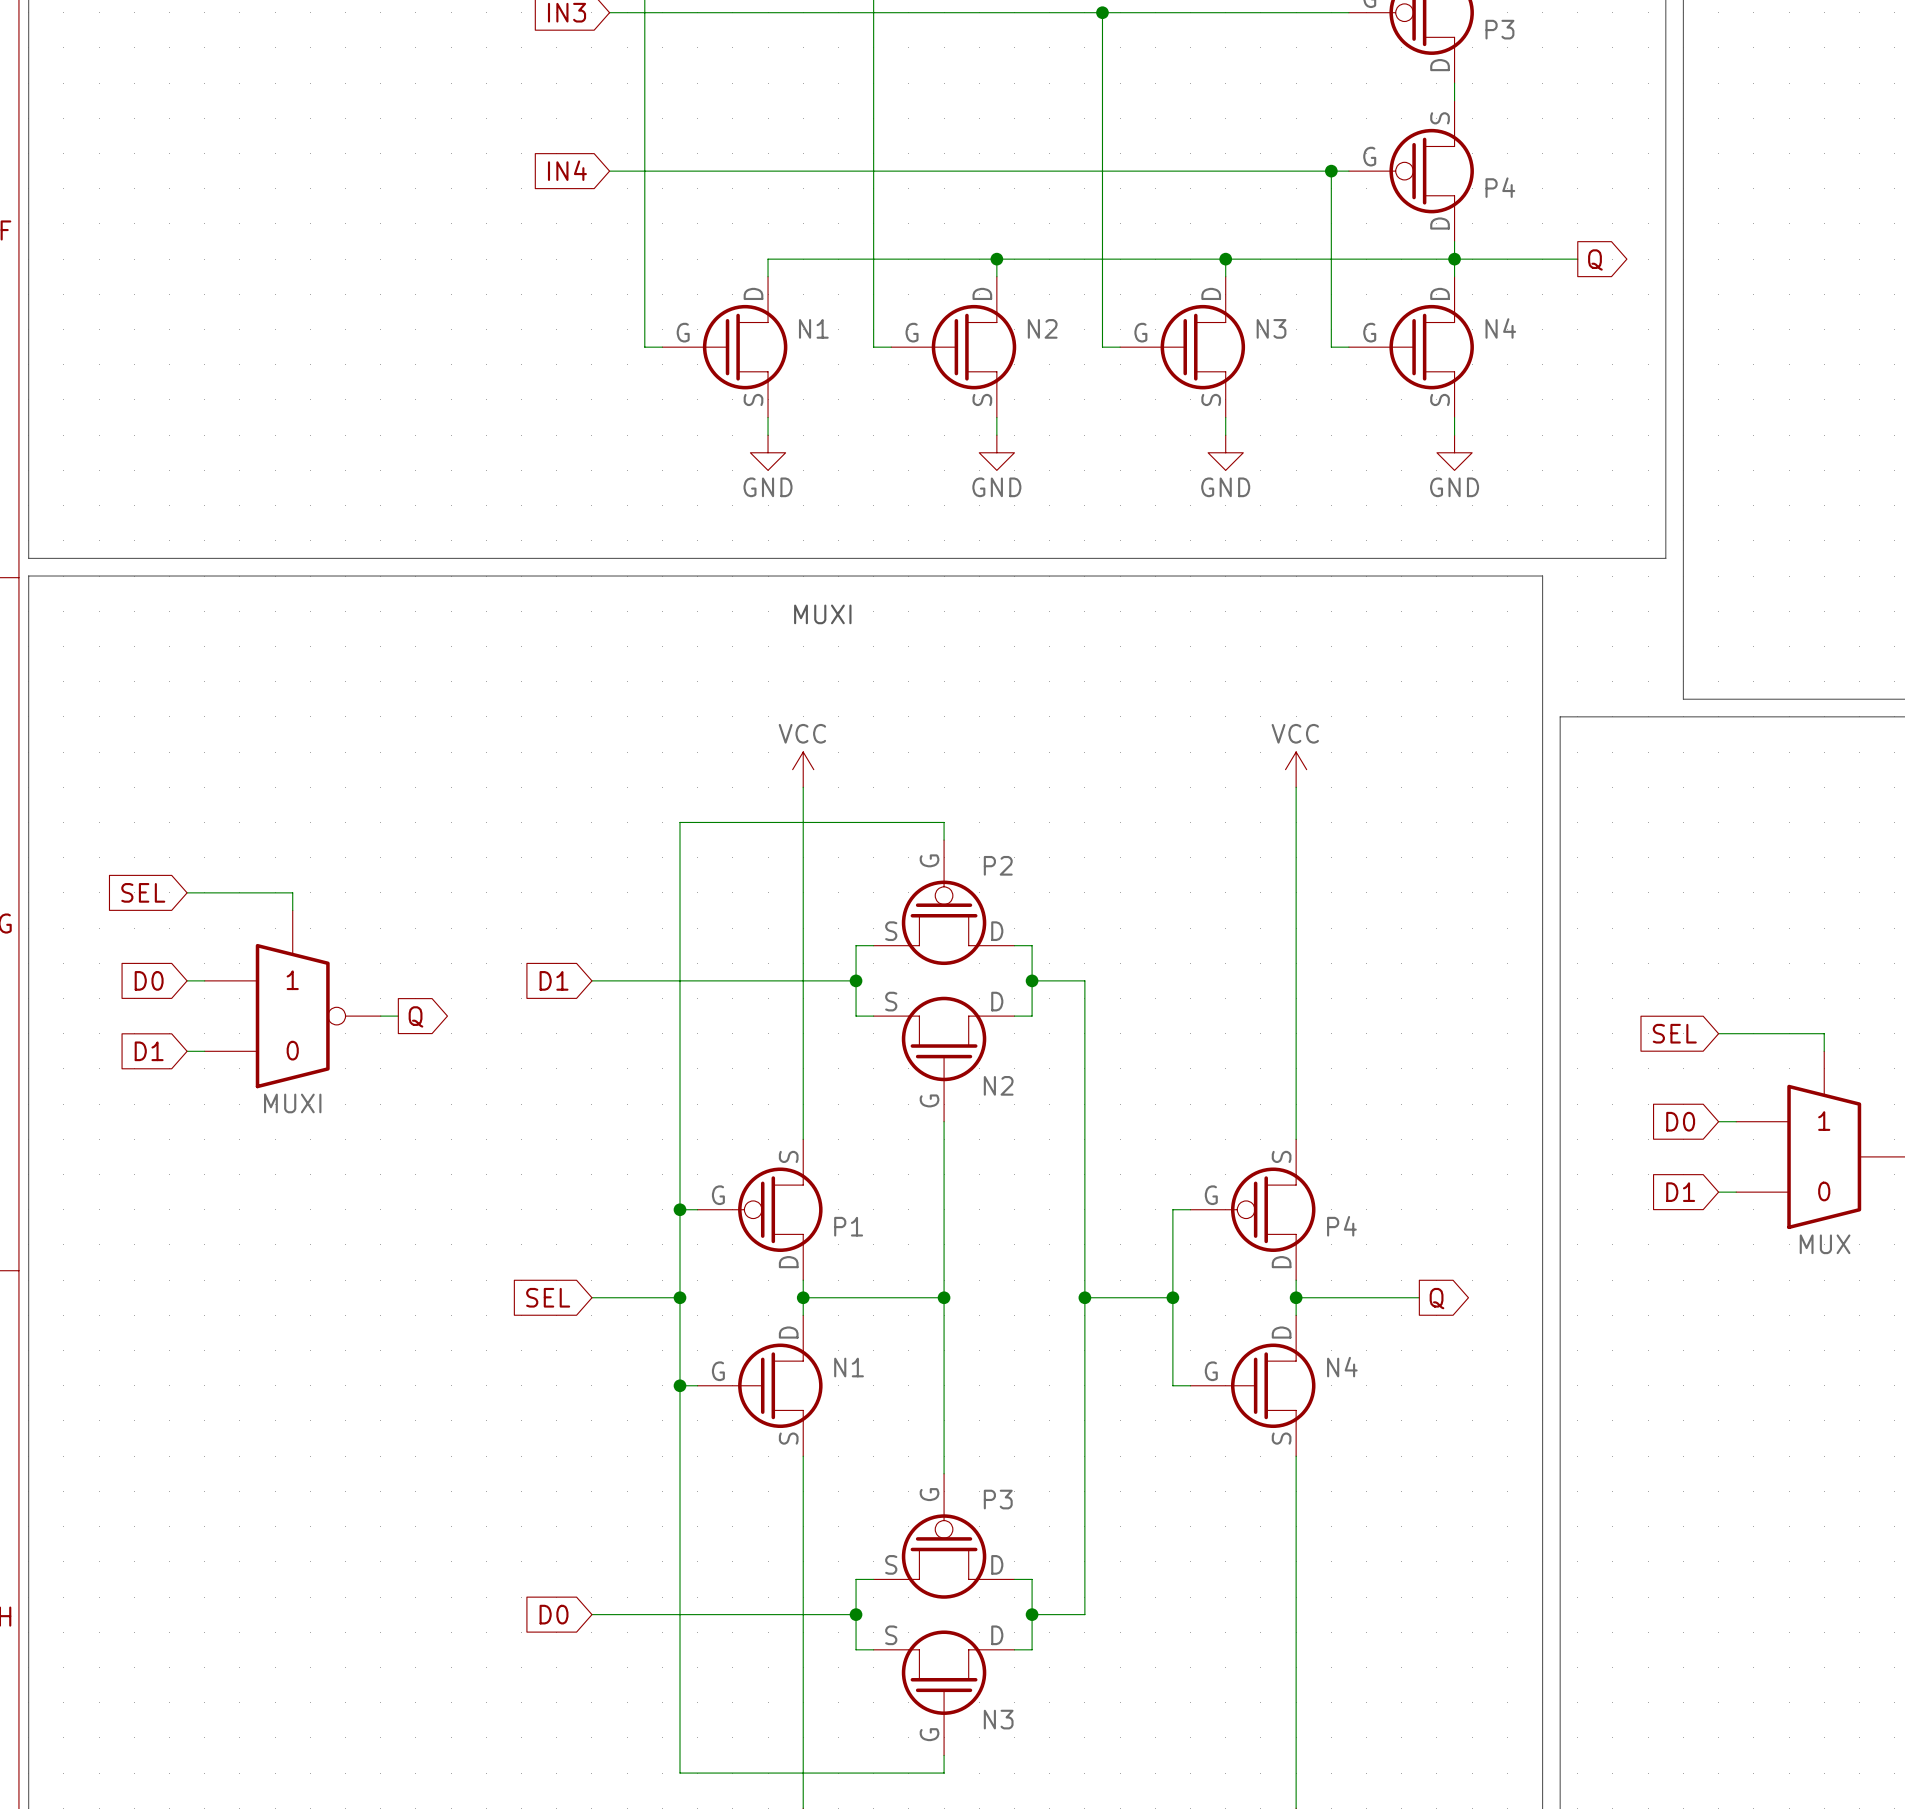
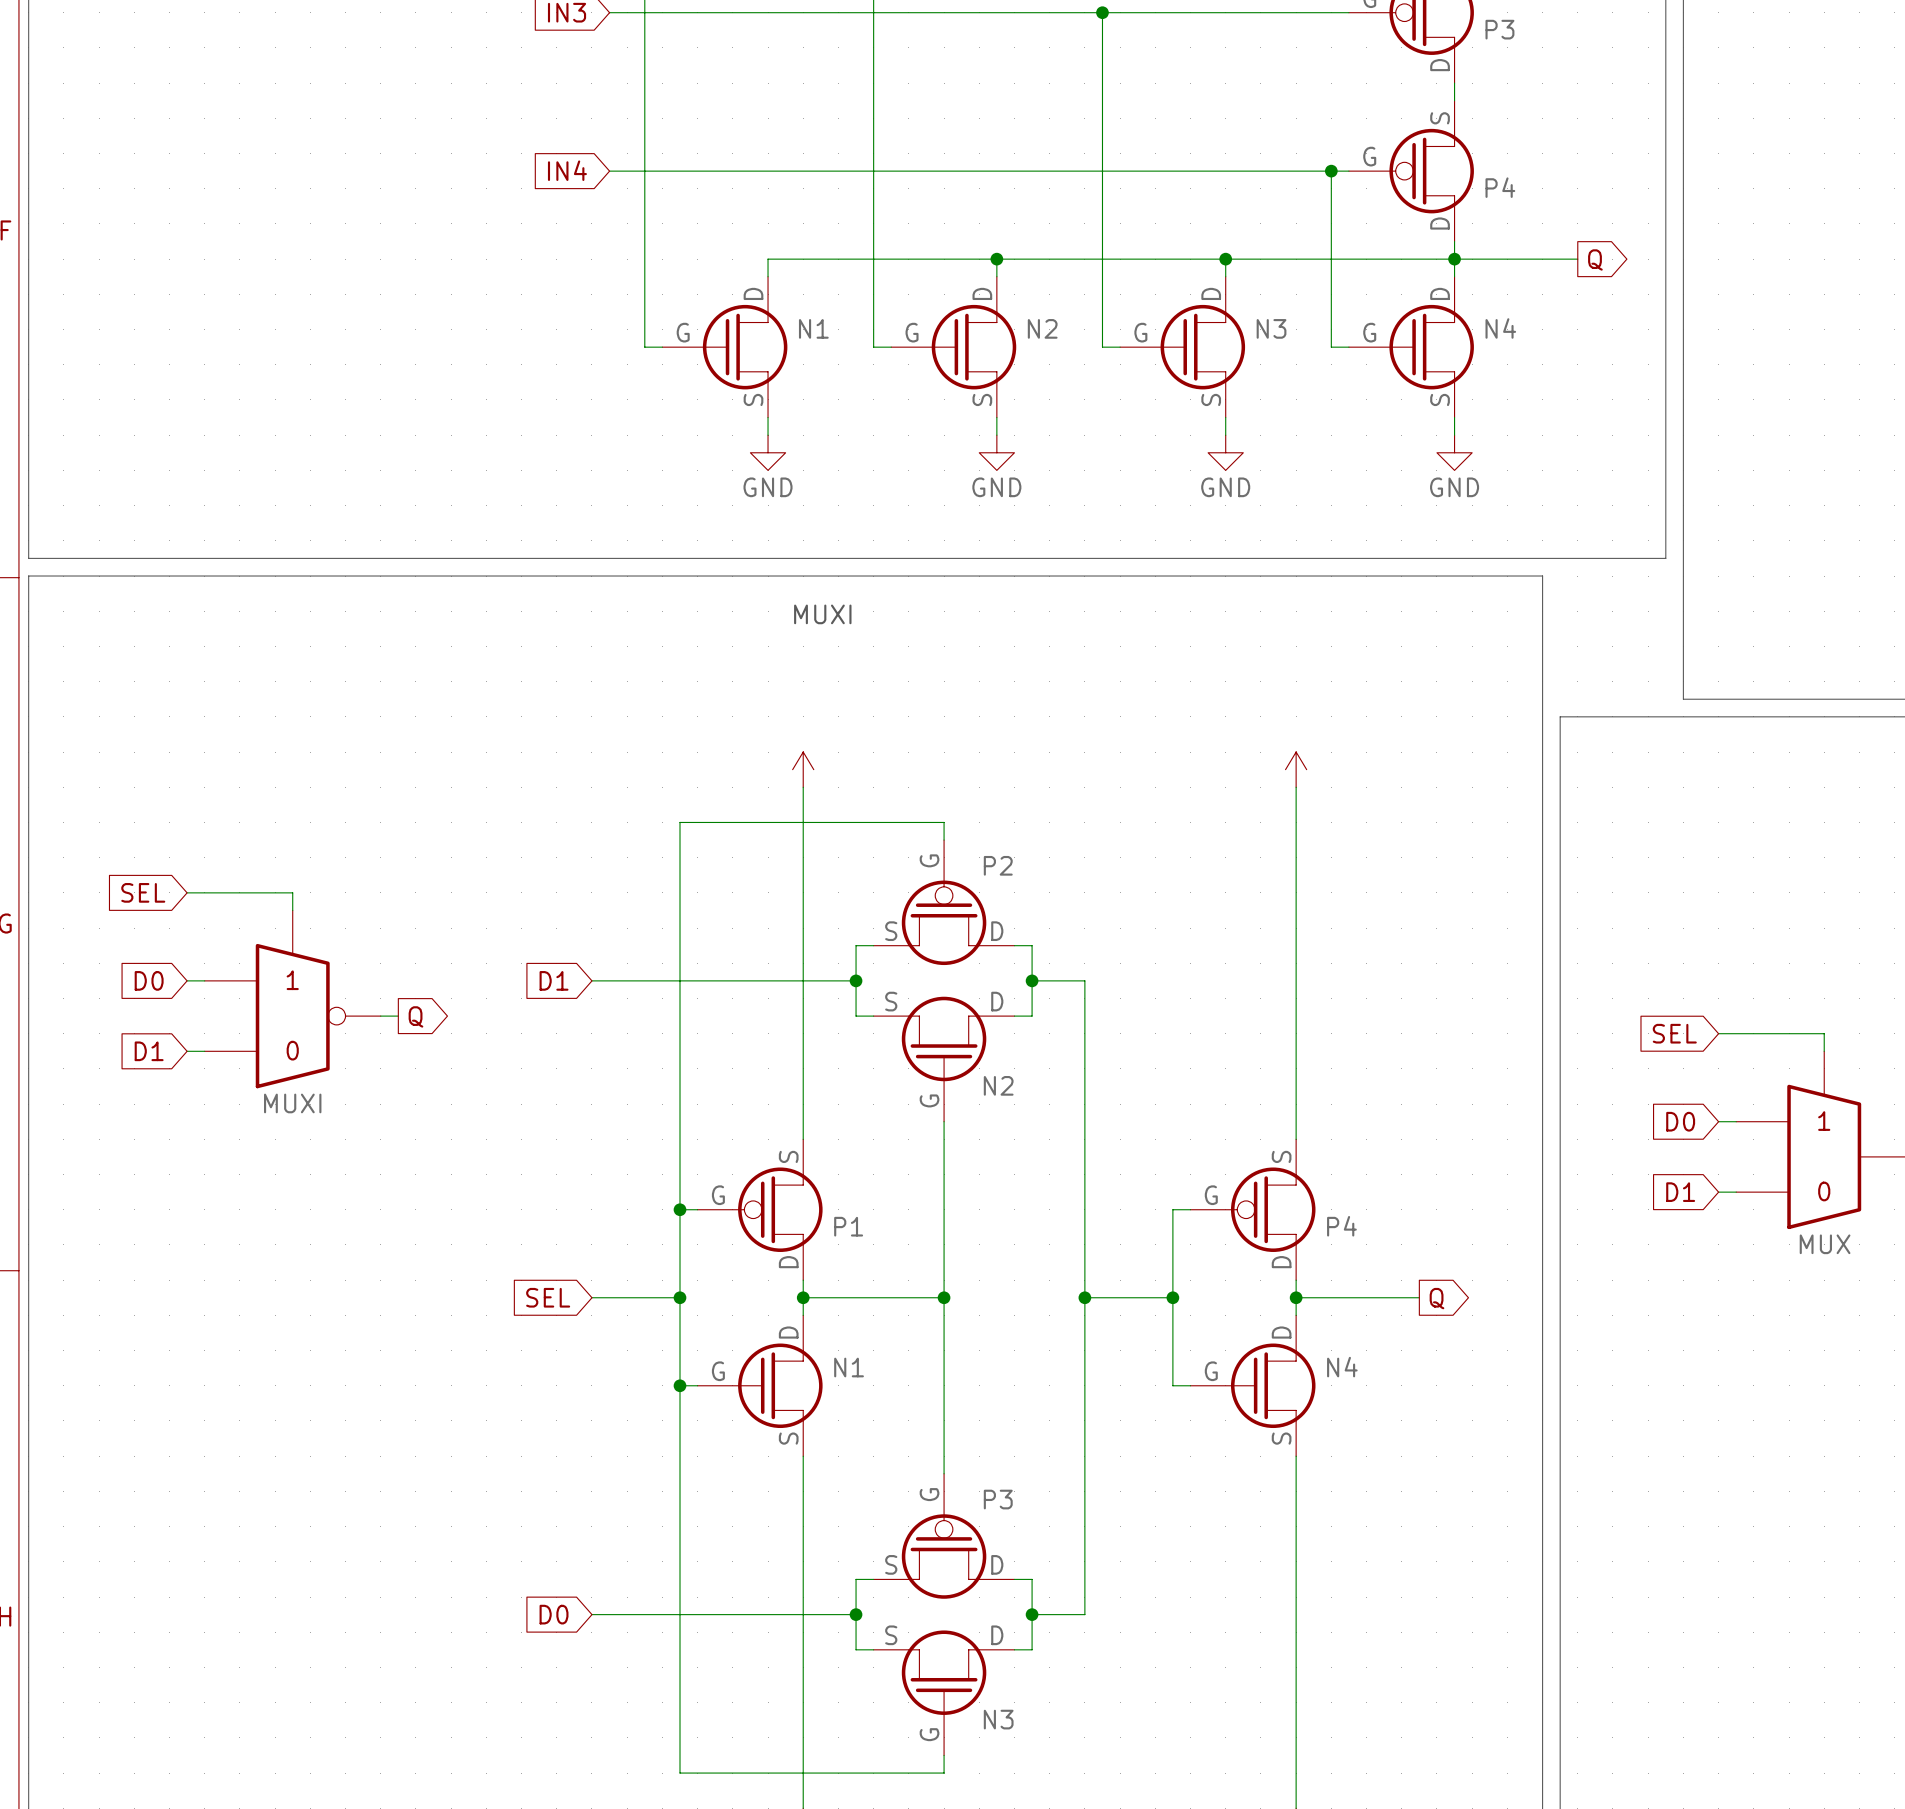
power symbol text: VCC (802, 733) -> none
power symbol text: VCC (1295, 733) -> none

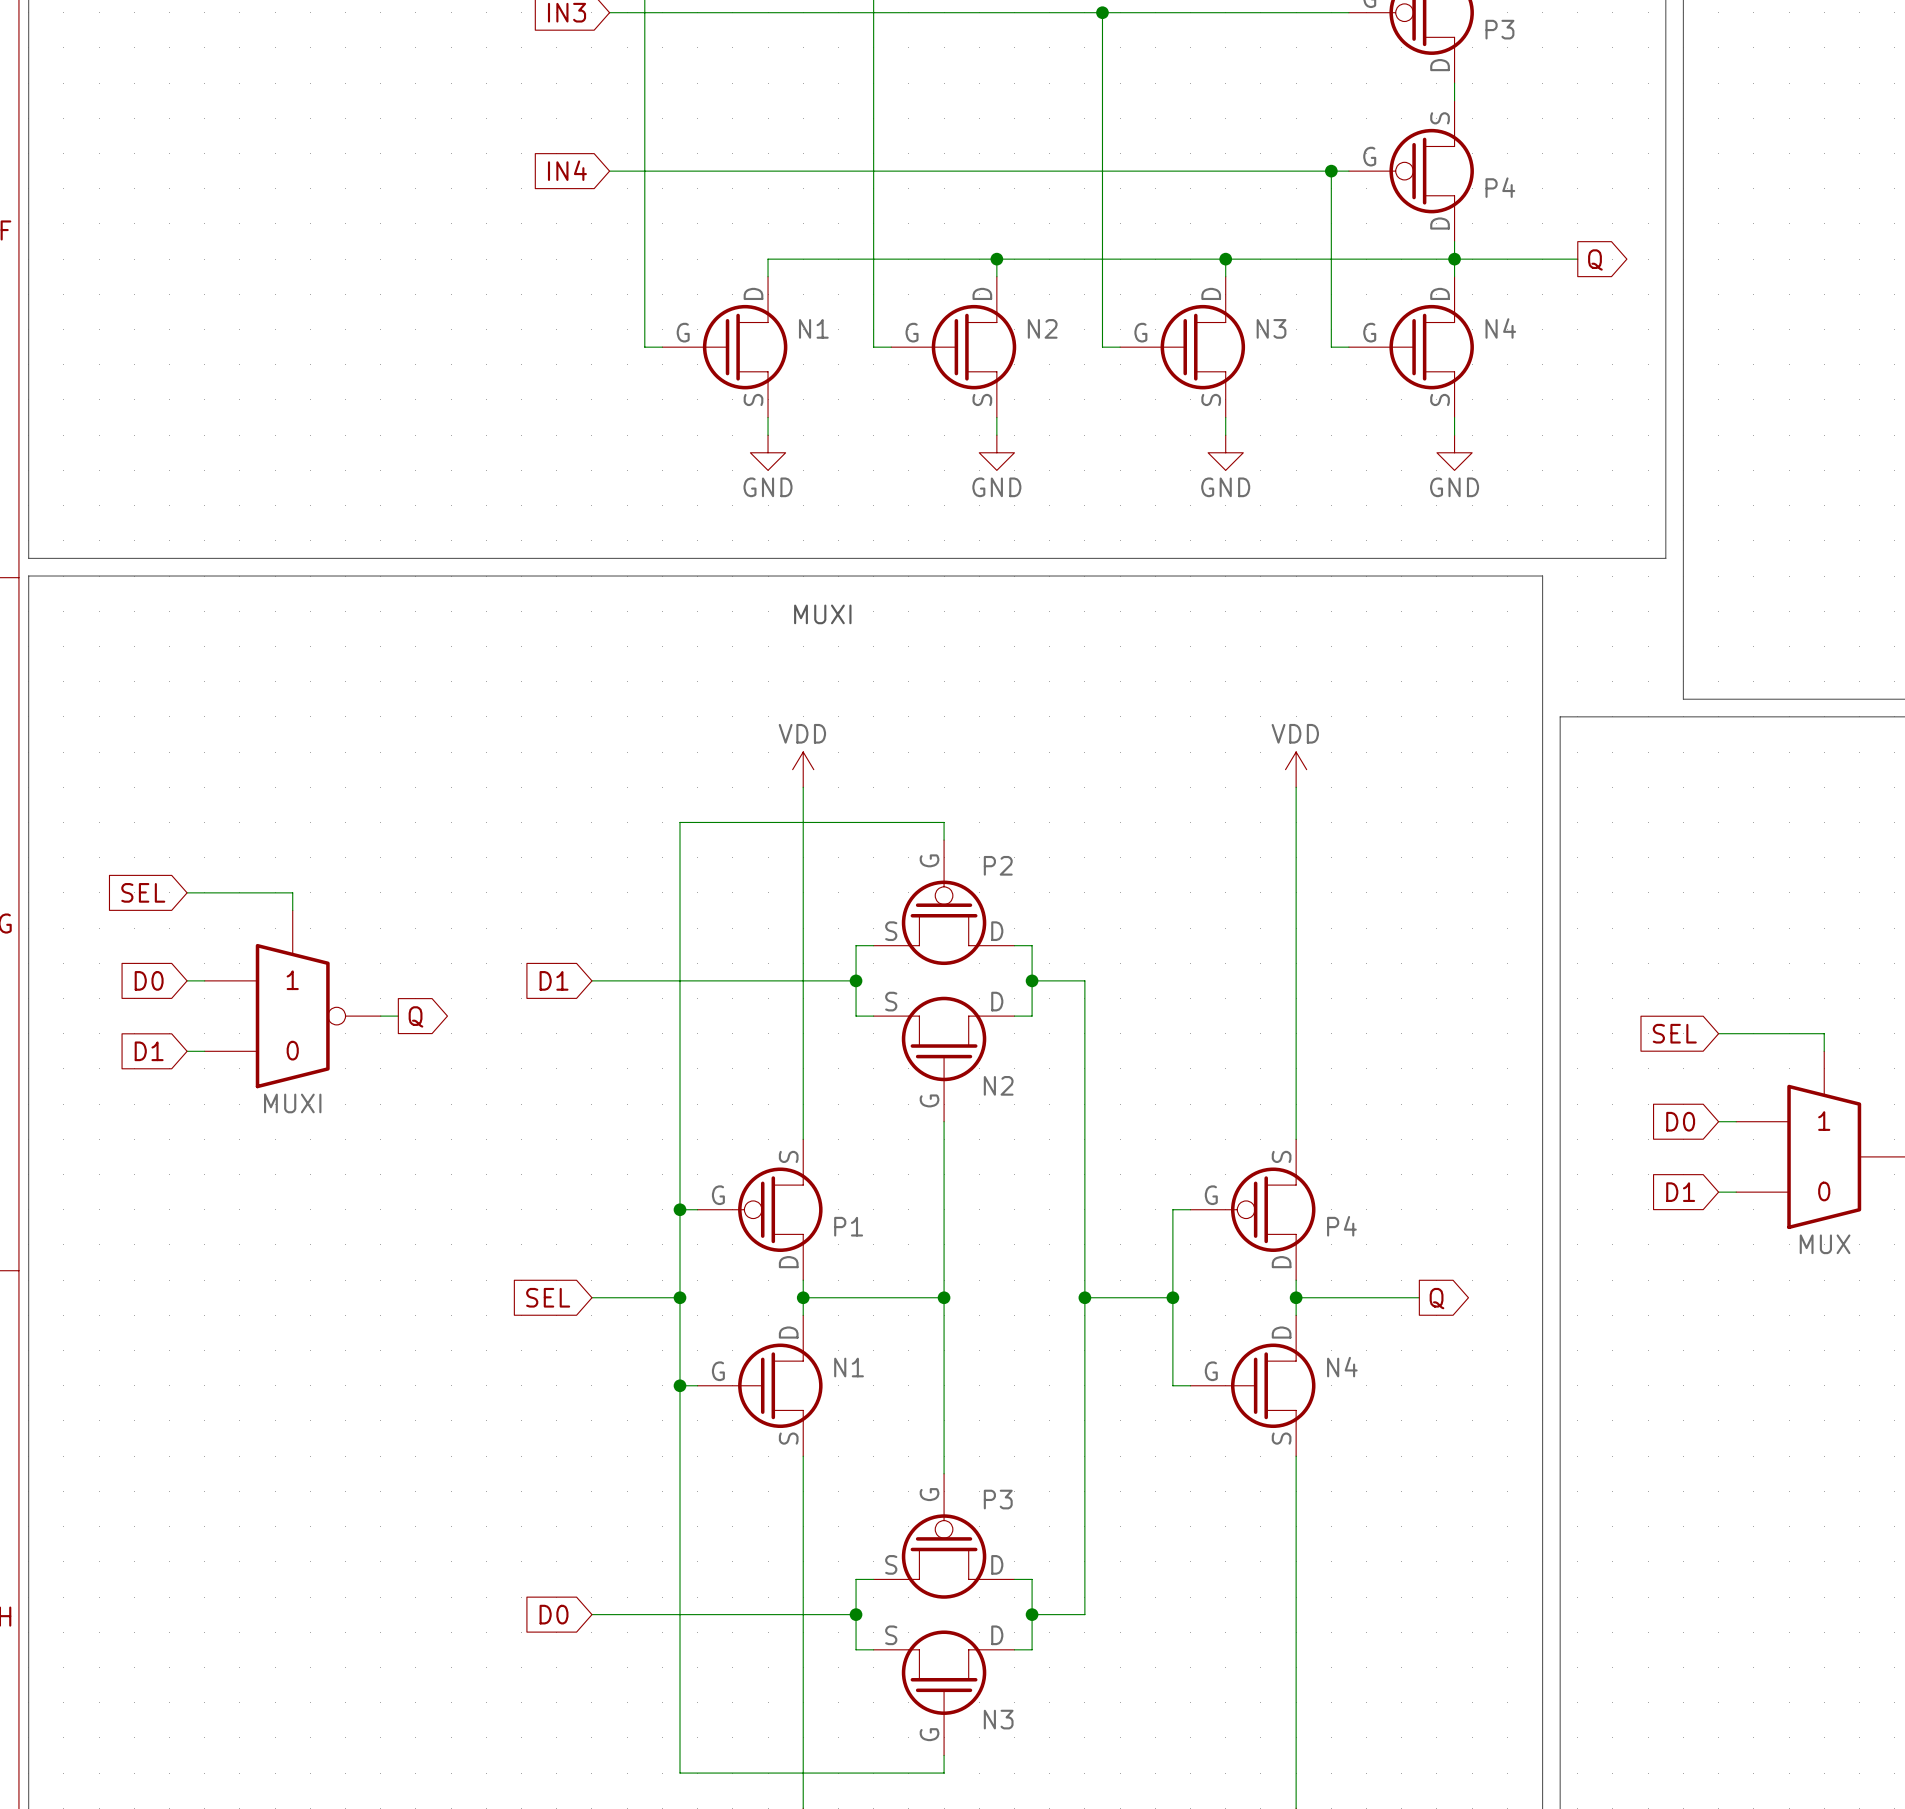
power symbol text: none -> VDD (802, 733)
power symbol text: none -> VDD (1295, 733)

